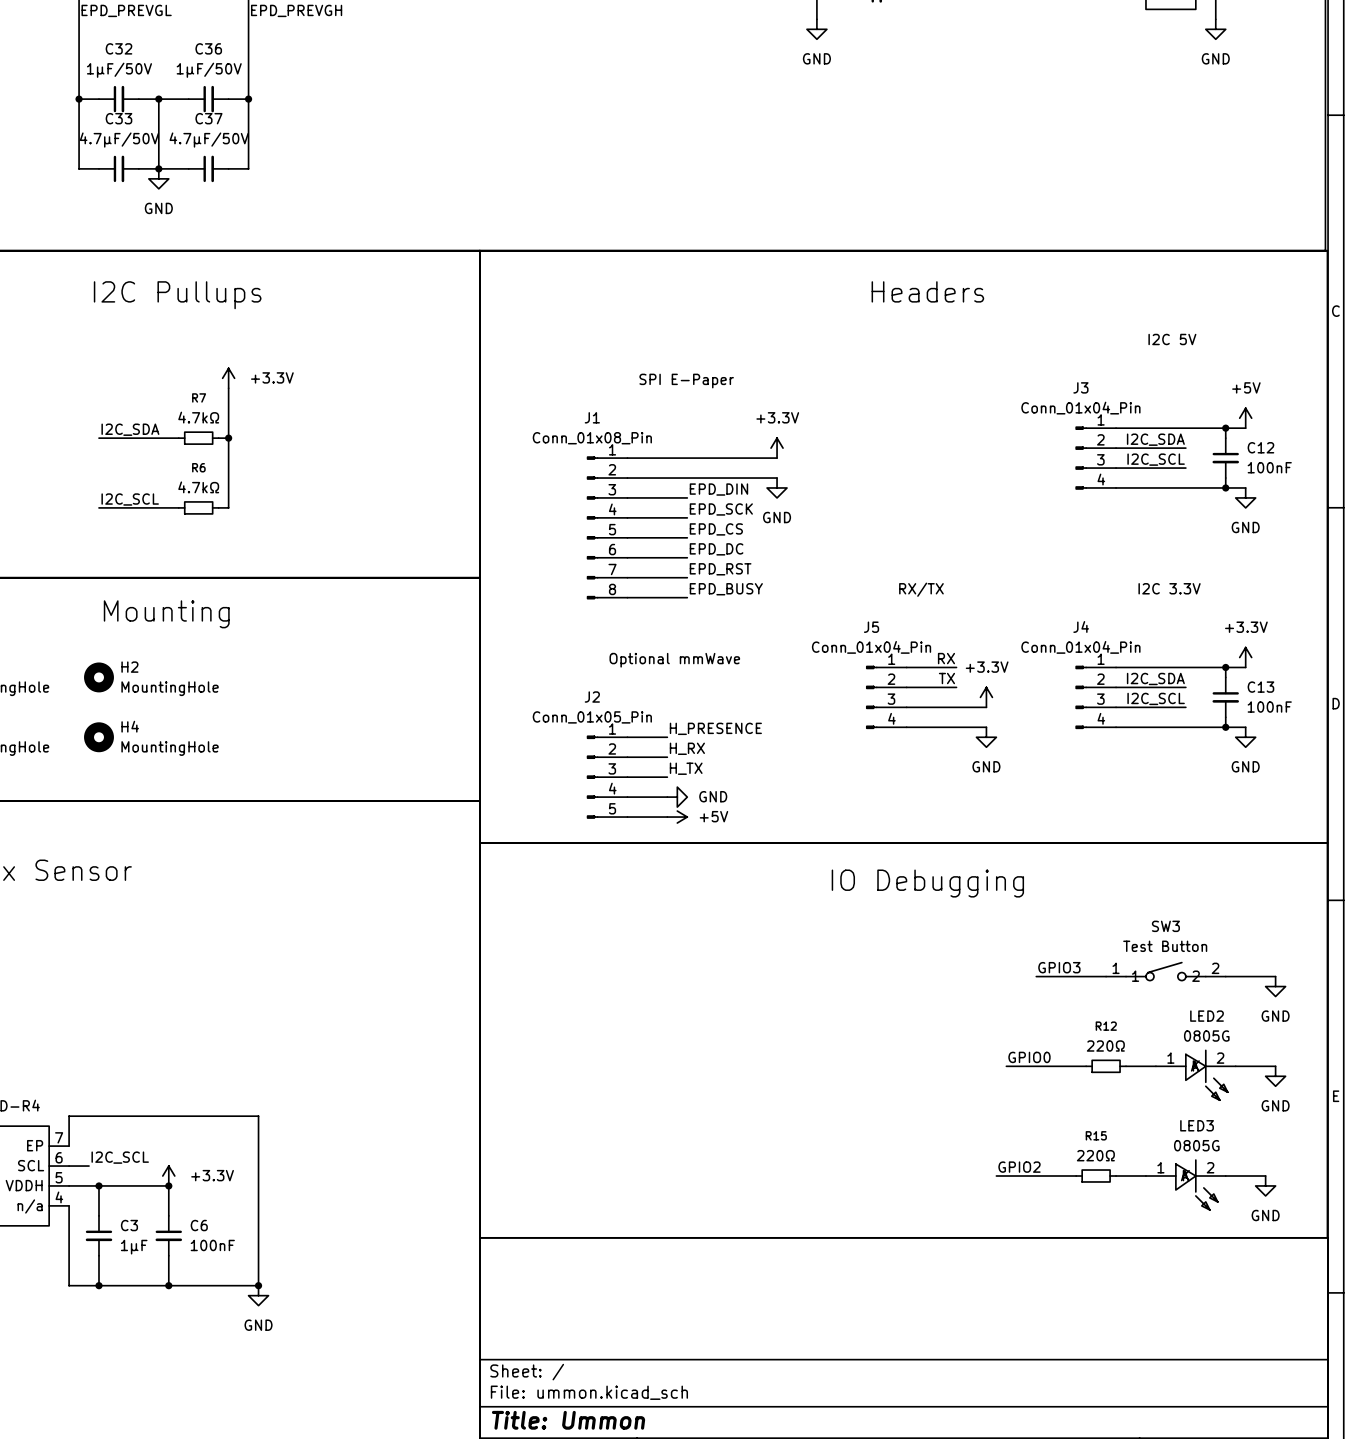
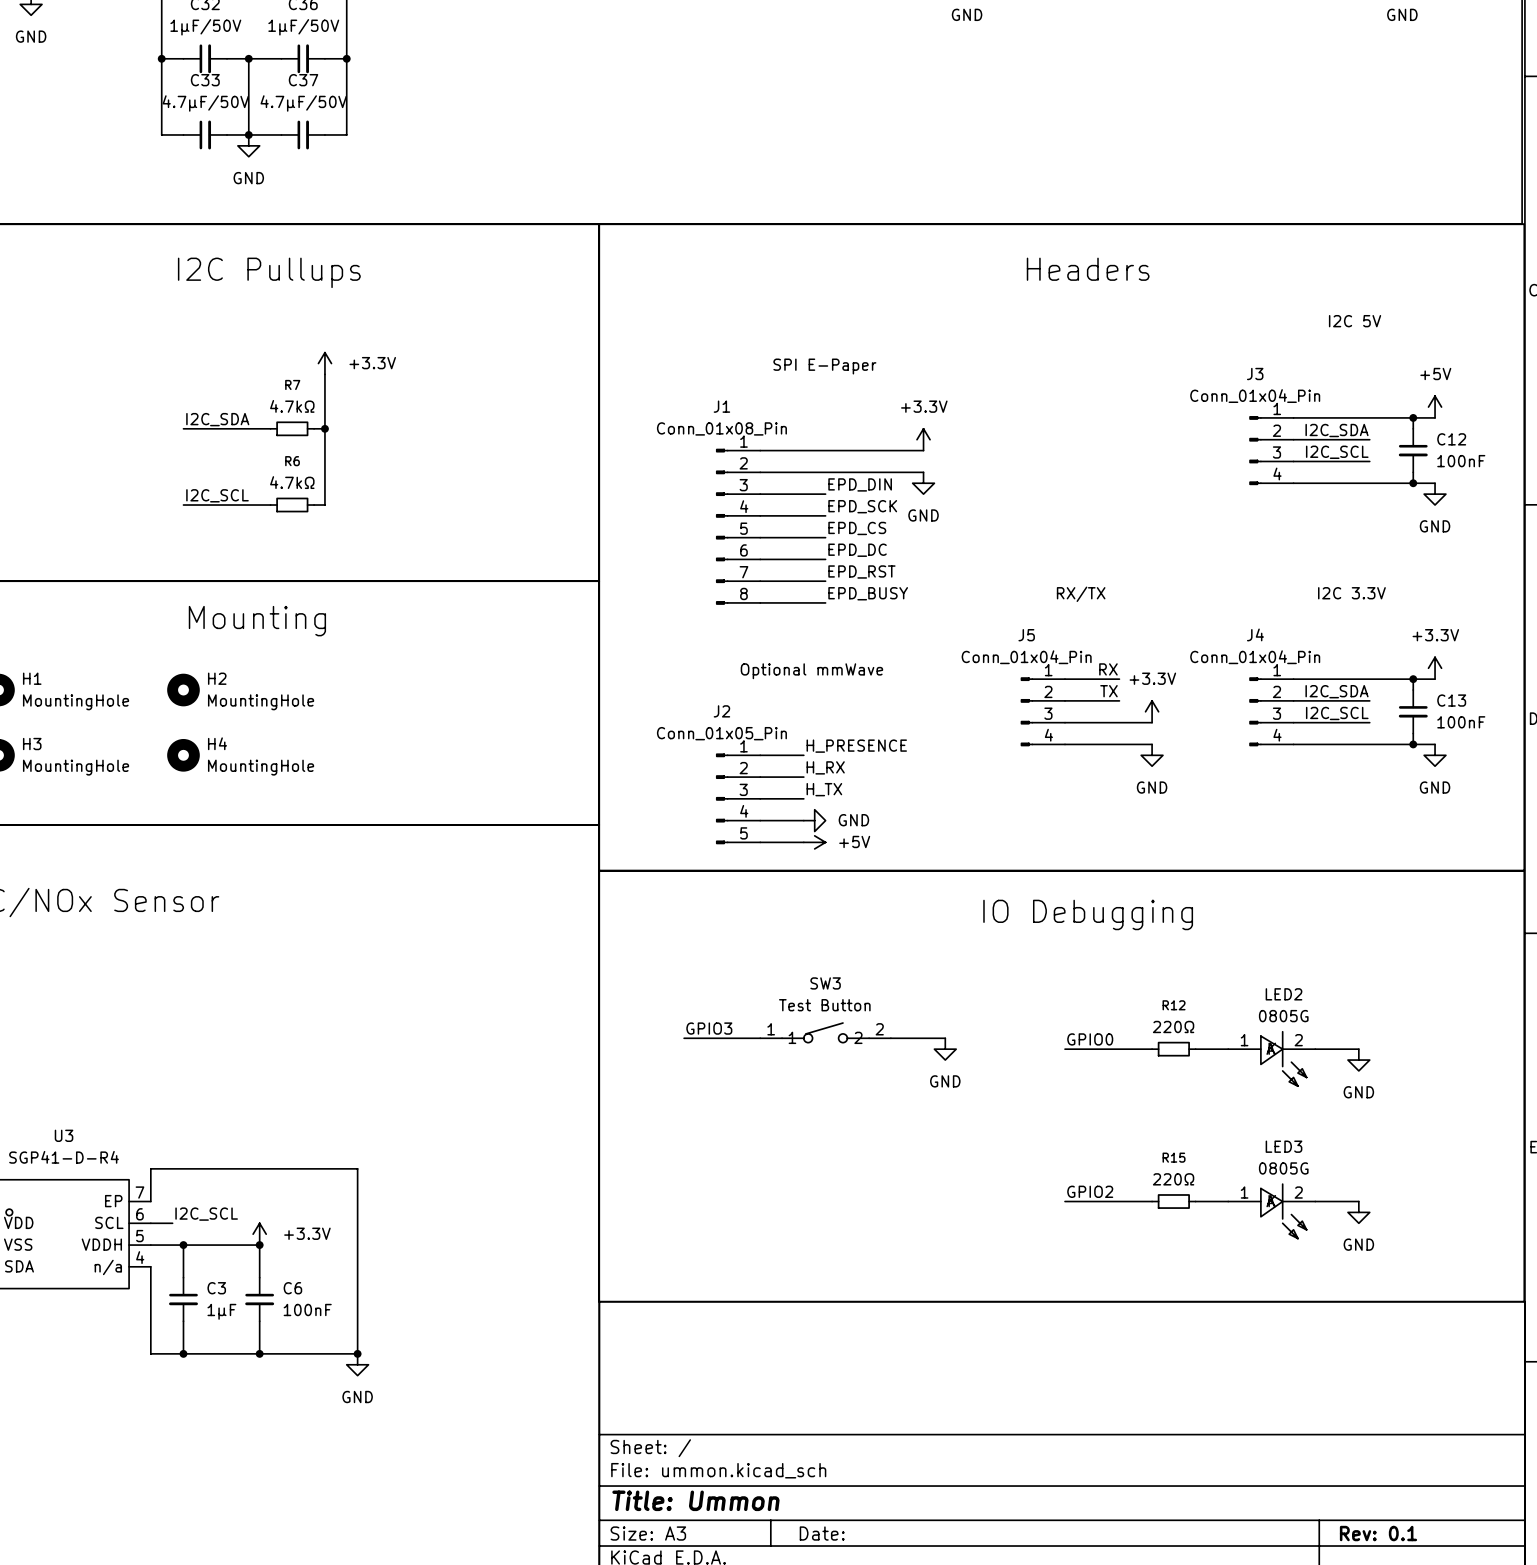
label: GPIO3 (1059, 967) -> none
SW3 position: (1165, 971) -> (825, 1032)
wire: (1036, 976) (1106, 976) -> none
wire: (1225, 976) (1275, 976) -> none
power symbol: GND (1275, 986) -> none
label: none -> GPIO3 (709, 1028)
wire: none -> (684, 1038) (760, 1038)
wire: none -> (890, 1038) (945, 1038)
power symbol: none -> GND (945, 1049)
power symbol: none -> GND (1358, 1060)
label position: GPIO0 (1029, 1057) -> GPIO0 (1090, 1039)
wire: (1006, 1066) (1086, 1066) -> (1065, 1049) (1152, 1049)
R12 position: (1106, 1066) -> (1173, 1049)
wire: (1126, 1066) (1155, 1066) -> (1195, 1049) (1228, 1049)
wire: (1235, 1066) (1275, 1066) -> (1315, 1049) (1358, 1049)
LED2 position: (1195, 1075) -> (1271, 1058)
power symbol: GND (1275, 1076) -> none
power symbol: none -> GND (1358, 1212)
label position: GPIO2 (1019, 1167) -> GPIO2 (1090, 1191)
wire: (996, 1176) (1076, 1176) -> (1065, 1201) (1152, 1201)
R15 position: (1096, 1176) -> (1173, 1201)
wire: (1116, 1176) (1145, 1176) -> (1195, 1201) (1228, 1201)
wire: (1225, 1176) (1265, 1176) -> (1315, 1201) (1358, 1201)
LED3 position: (1185, 1184) -> (1271, 1211)
power symbol: GND (1265, 1185) -> none

